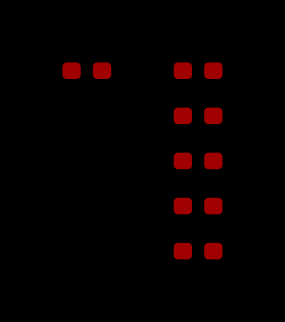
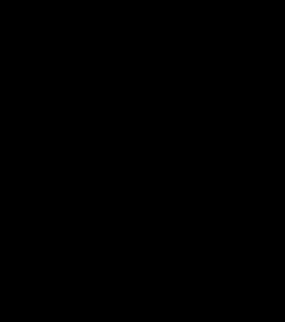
part: (86, 70) -> none
part: (198, 70) -> none
part: (198, 115) -> none
part: (198, 160) -> none
part: (198, 206) -> none
part: (198, 251) -> none

